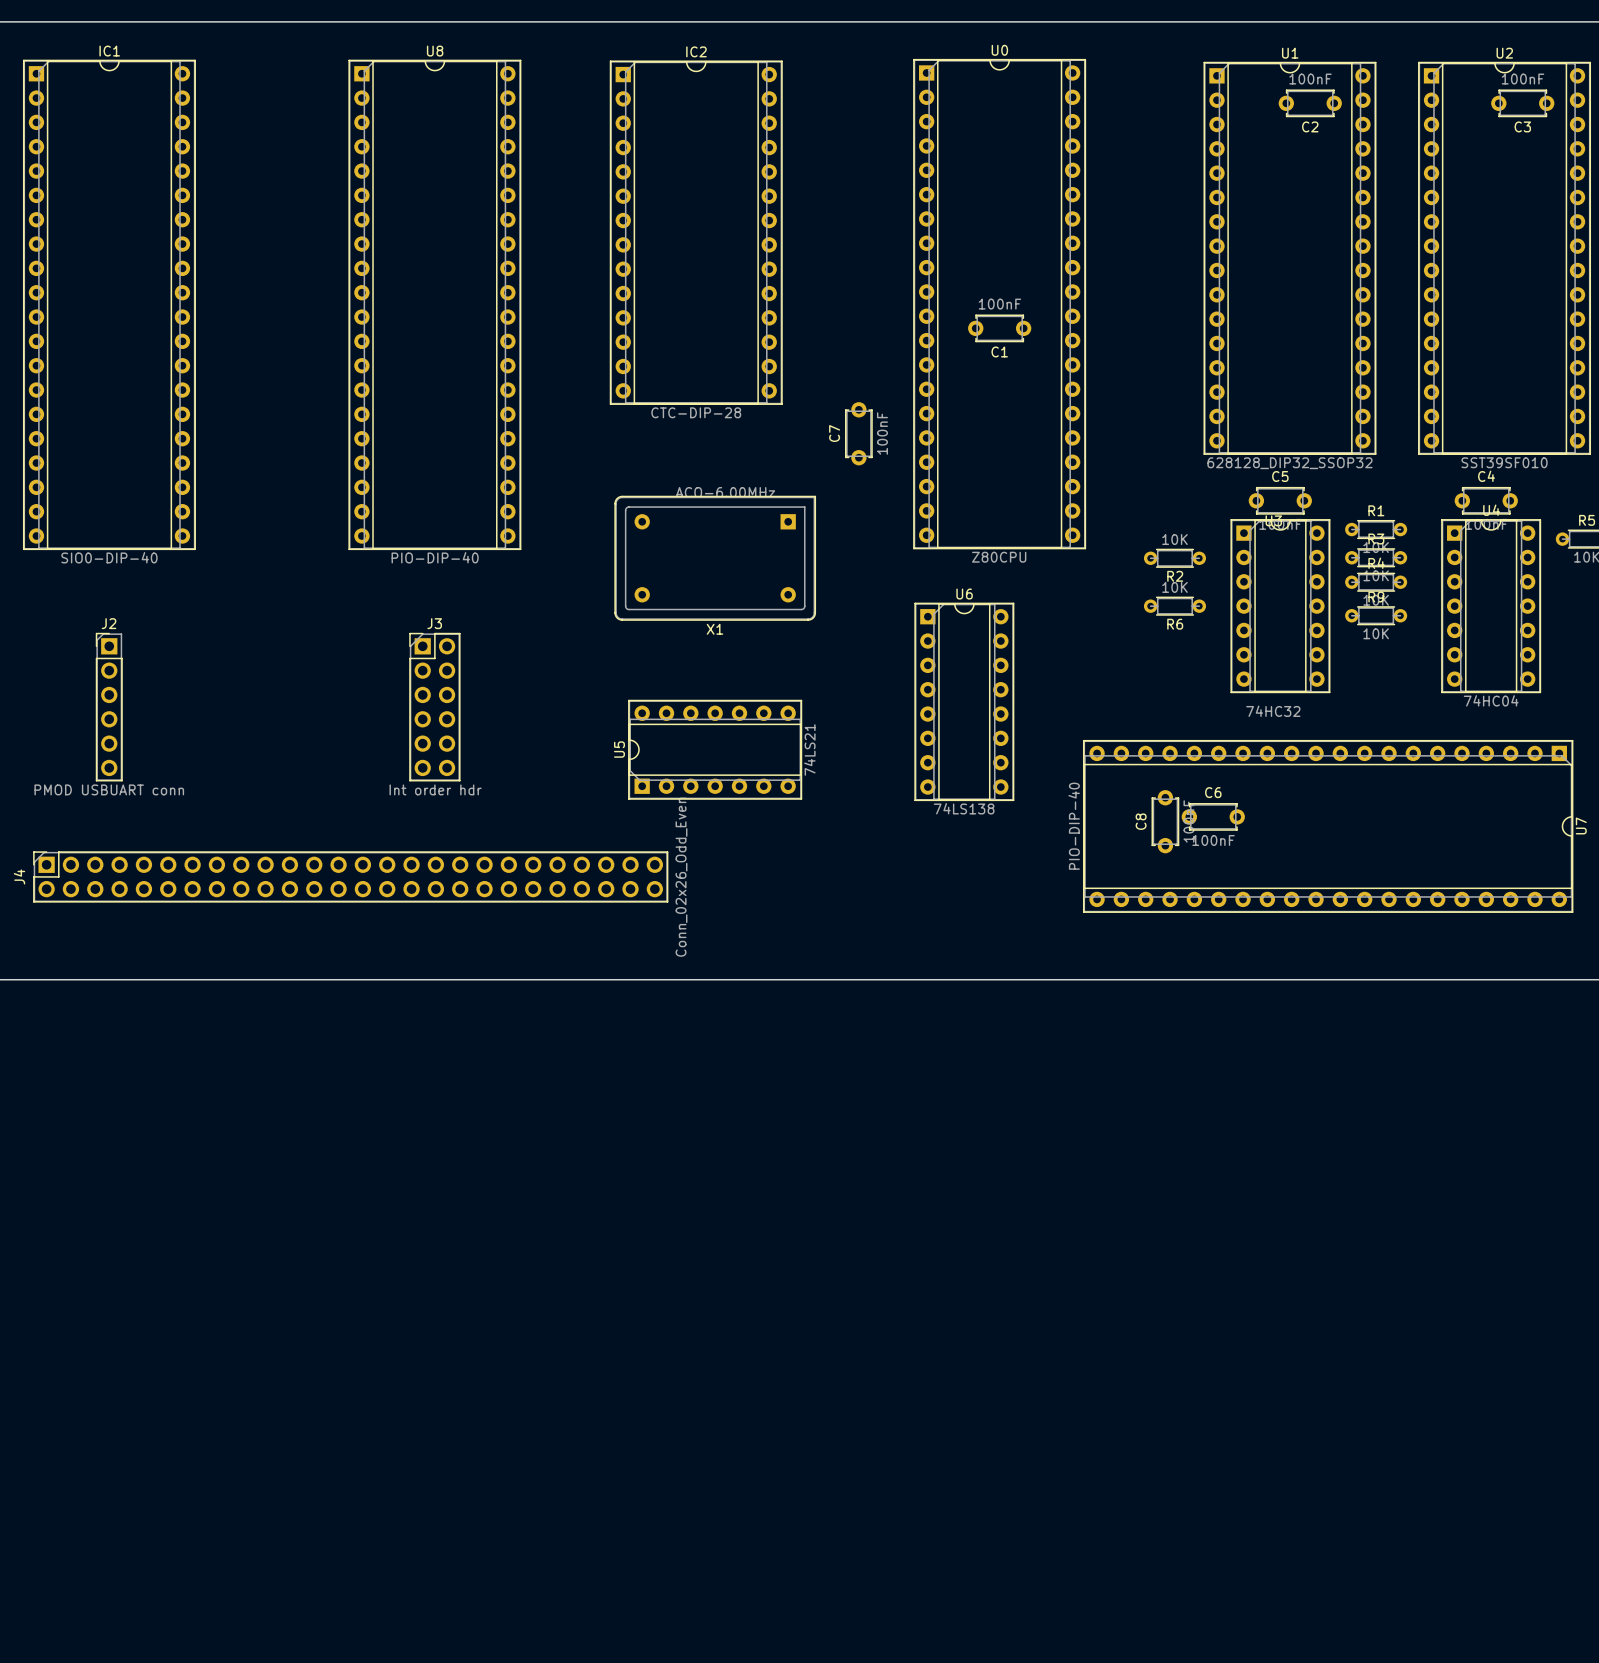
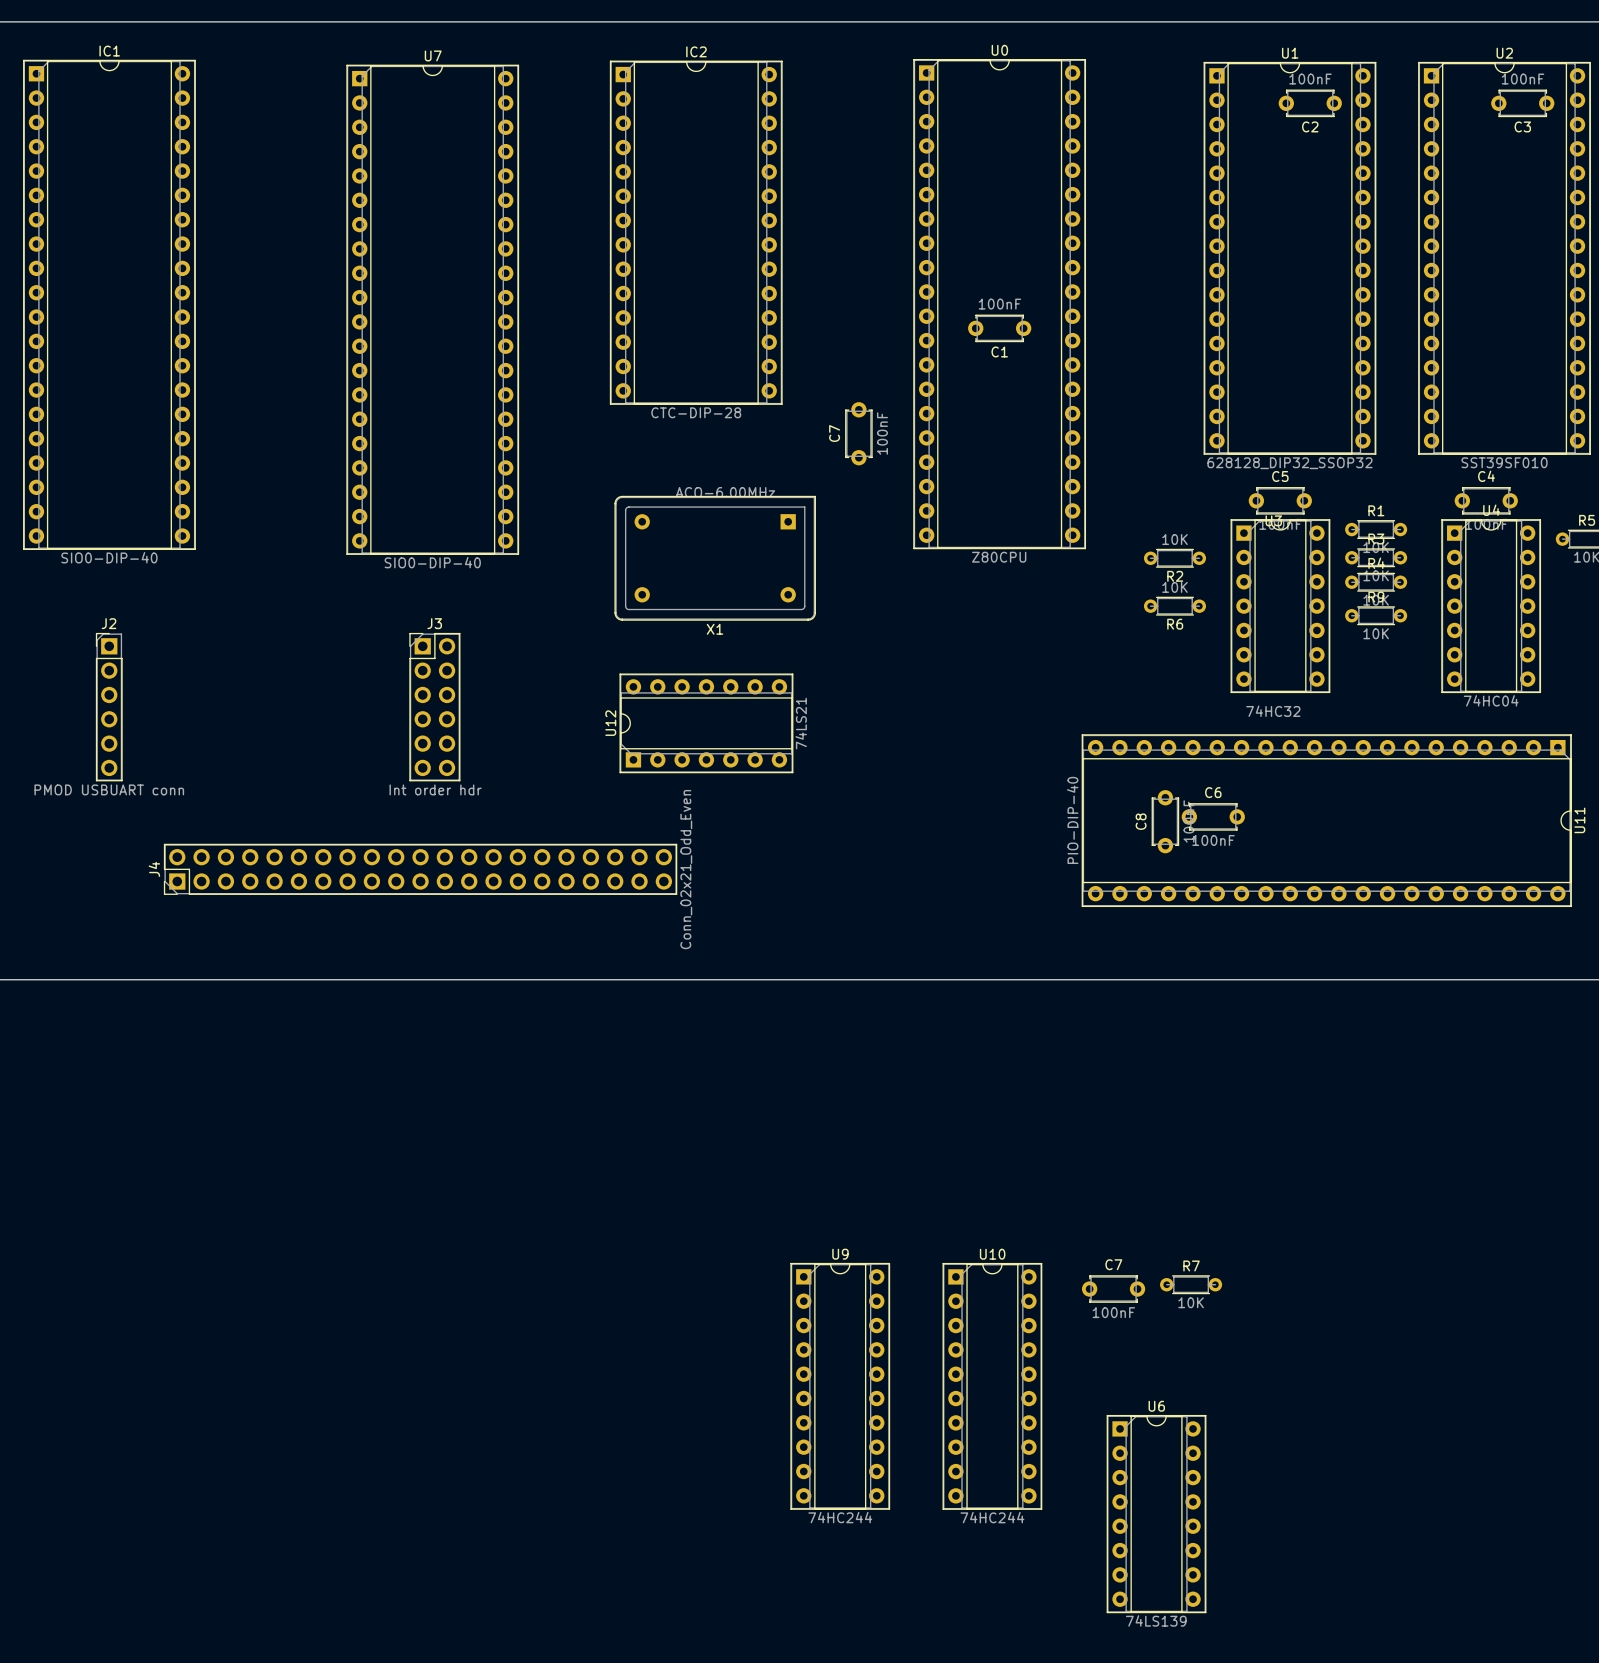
U8: PIO-DIP-40 (434, 304) -> none
U6 position: (964, 701) -> (1156, 1514)
U12: none -> 74LS21 (706, 723)
U5: 74LS21 (715, 749) -> none
U6 value: 74LS138 (964, 808) -> 74LS139 (1156, 1620)
U11: none -> PIO-DIP-40 (1326, 820)
U7 value: PIO-DIP-40 (1074, 826) -> SIO0-DIP-40 (432, 562)
U7 rotation: 0° (1328, 826) -> 90° counterclockwise (432, 309)
U7 position: (1328, 826) -> (432, 309)
J4 footprint: [33, 851, 669, 903] -> [163, 843, 678, 895]
J4 name position: J4 (19, 876) -> J4 (154, 869)
J4 value: Conn_02x26_Odd_Even (681, 877) -> Conn_02x21_Odd_Even (686, 869)
R7: none -> 10K (1191, 1284)
C7: none -> 100nF (1113, 1289)
U9: none -> 74HC244 (840, 1386)
U10: none -> 74HC244 (992, 1386)

